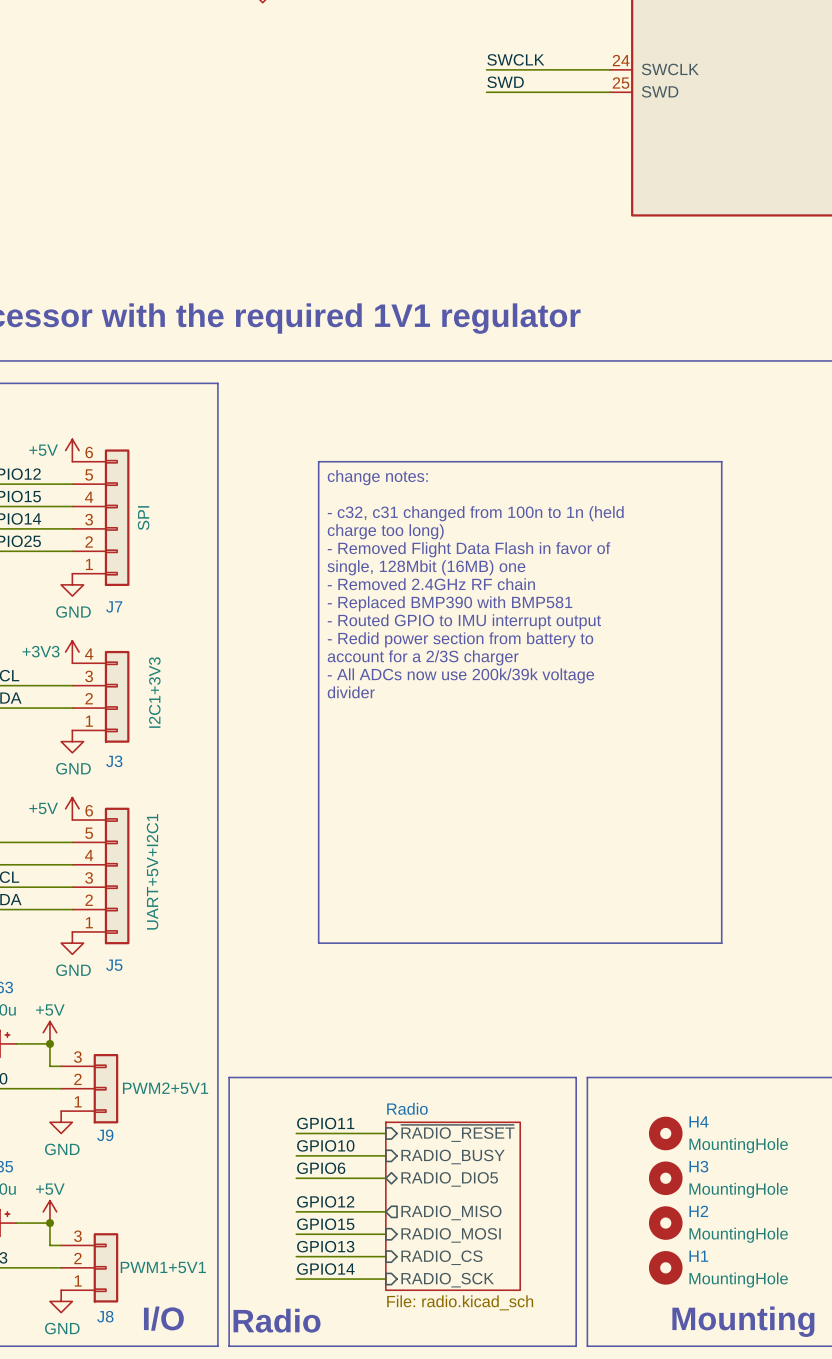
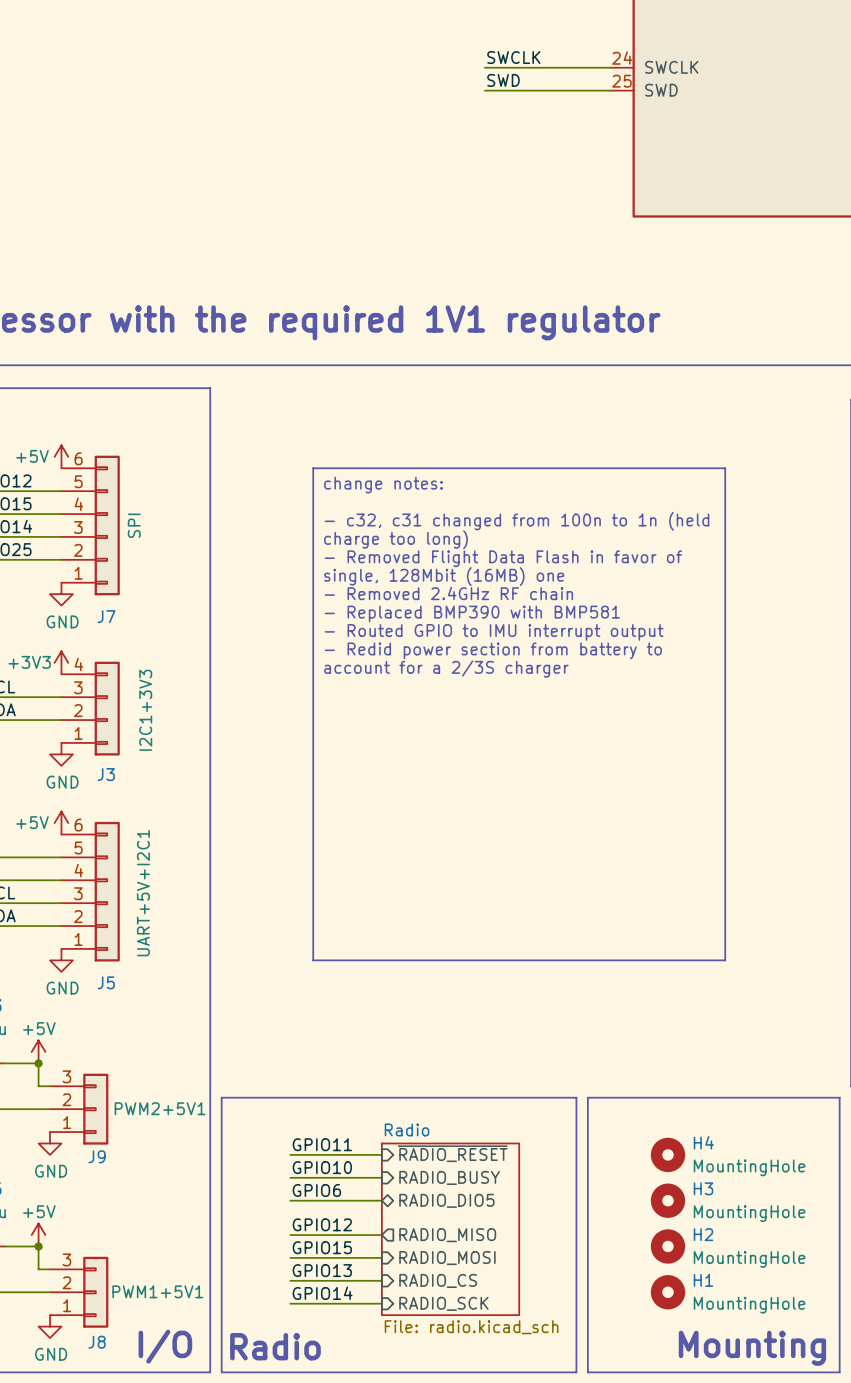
text: - All ADCs now use 200k/39k voltage (460, 675) -> none
text: divider (351, 692) -> none

